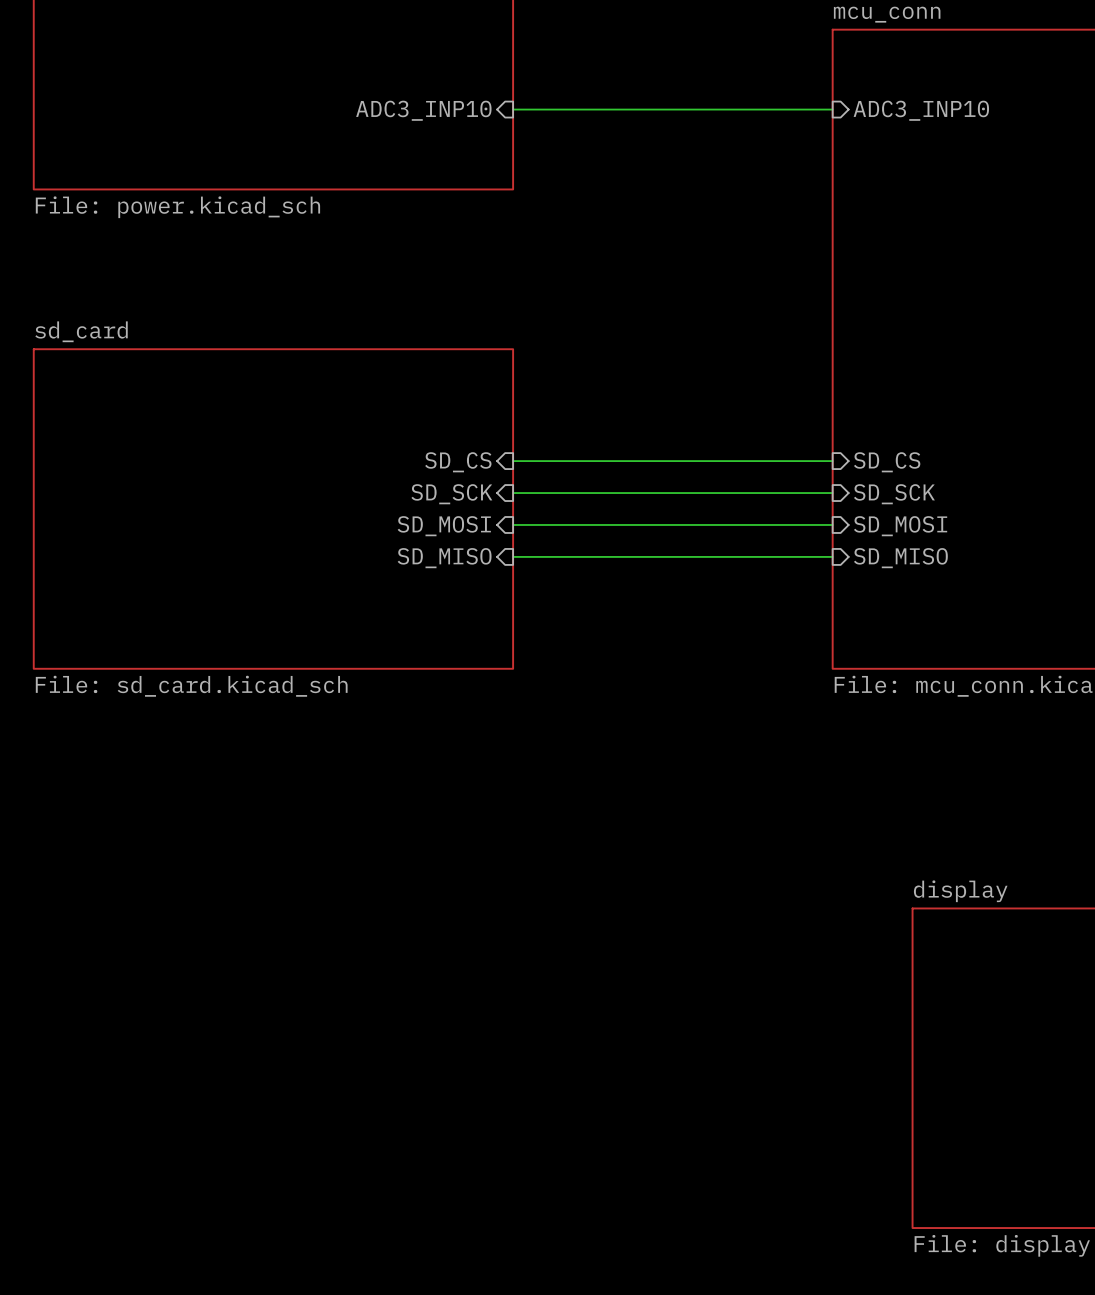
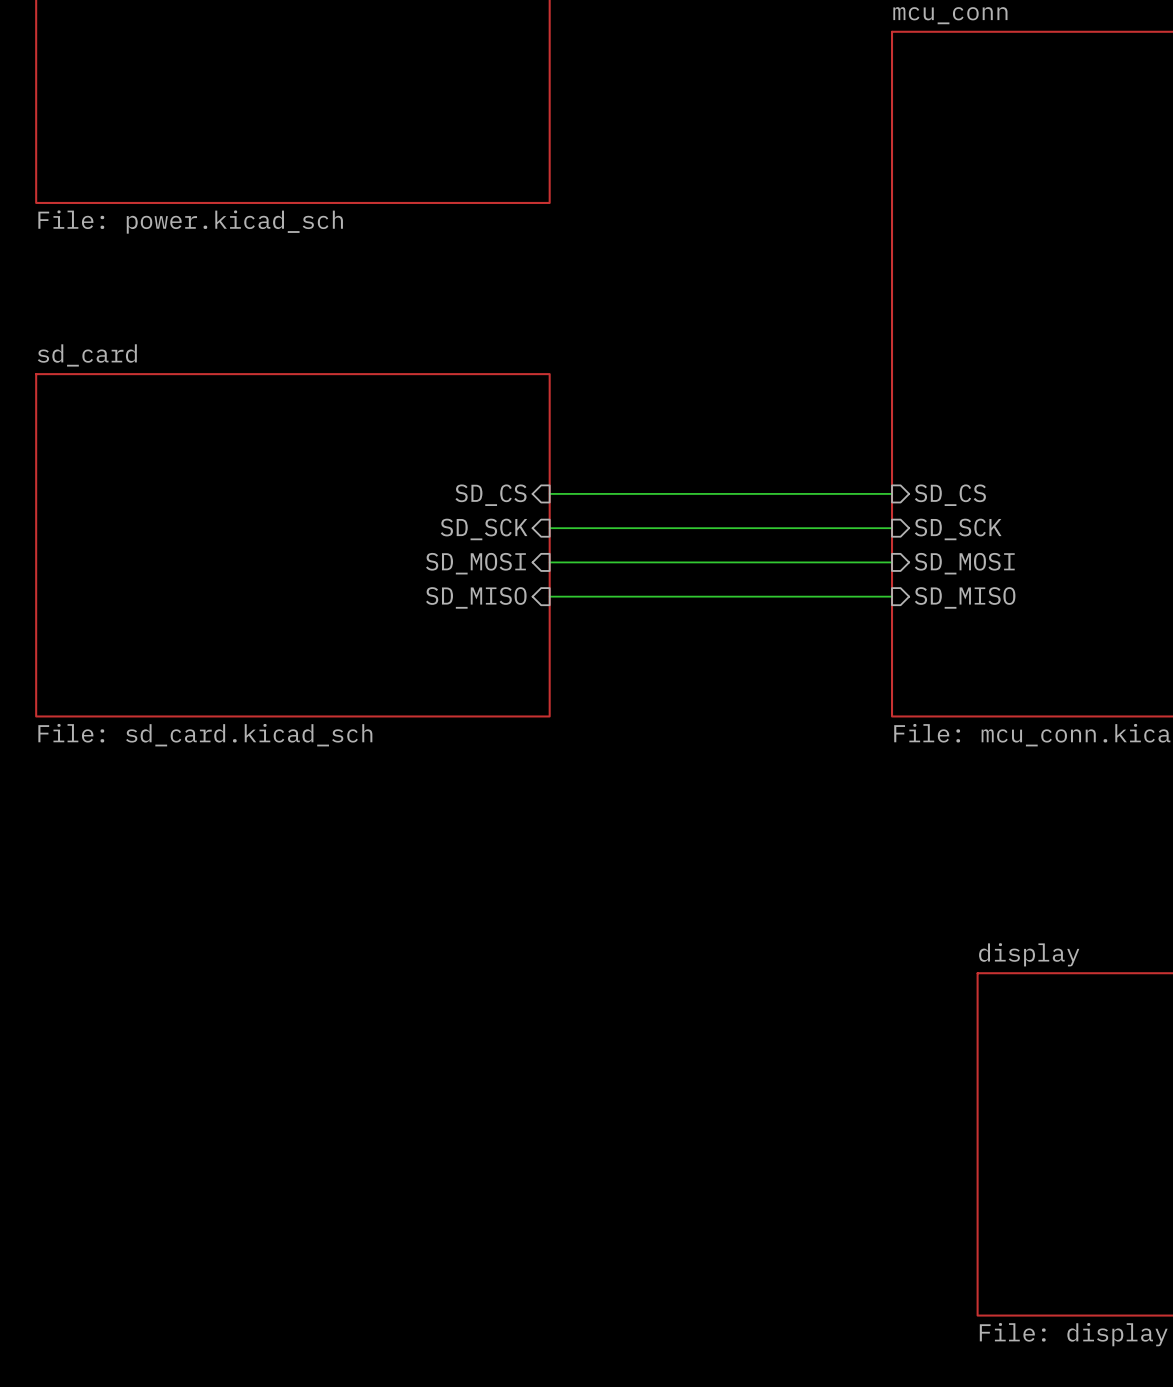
wire: (513, 109) (832, 109) -> none
sheet pin: ADC3_INP10 (423, 110) -> none
sheet pin: ADC3_INP10 (921, 110) -> none

